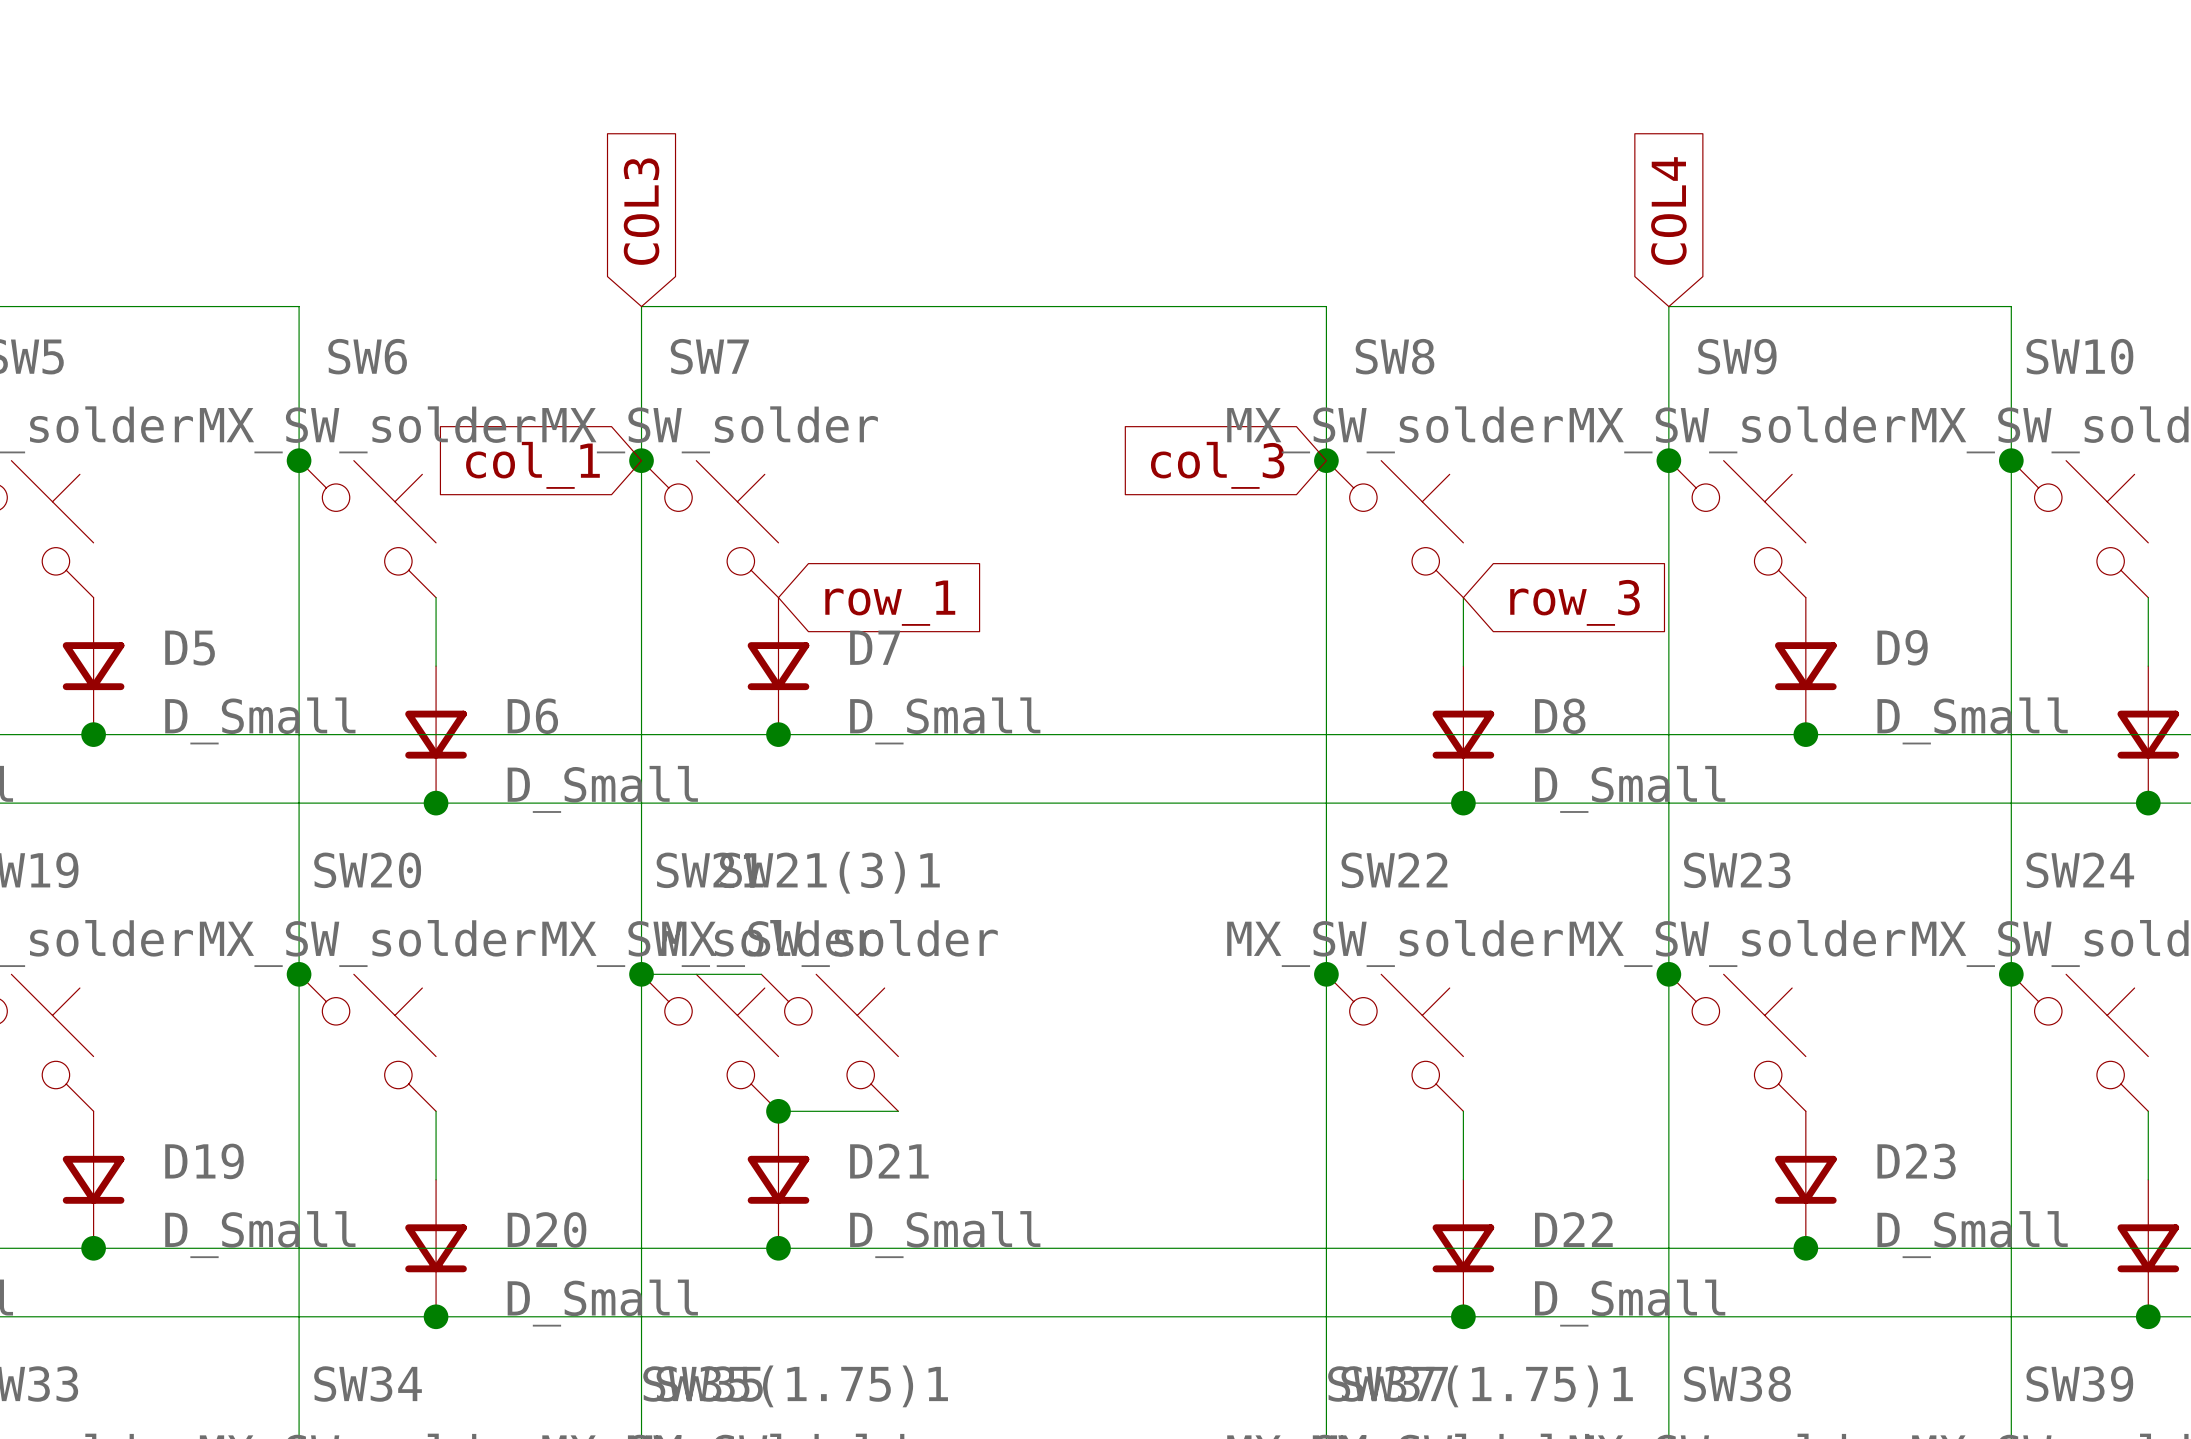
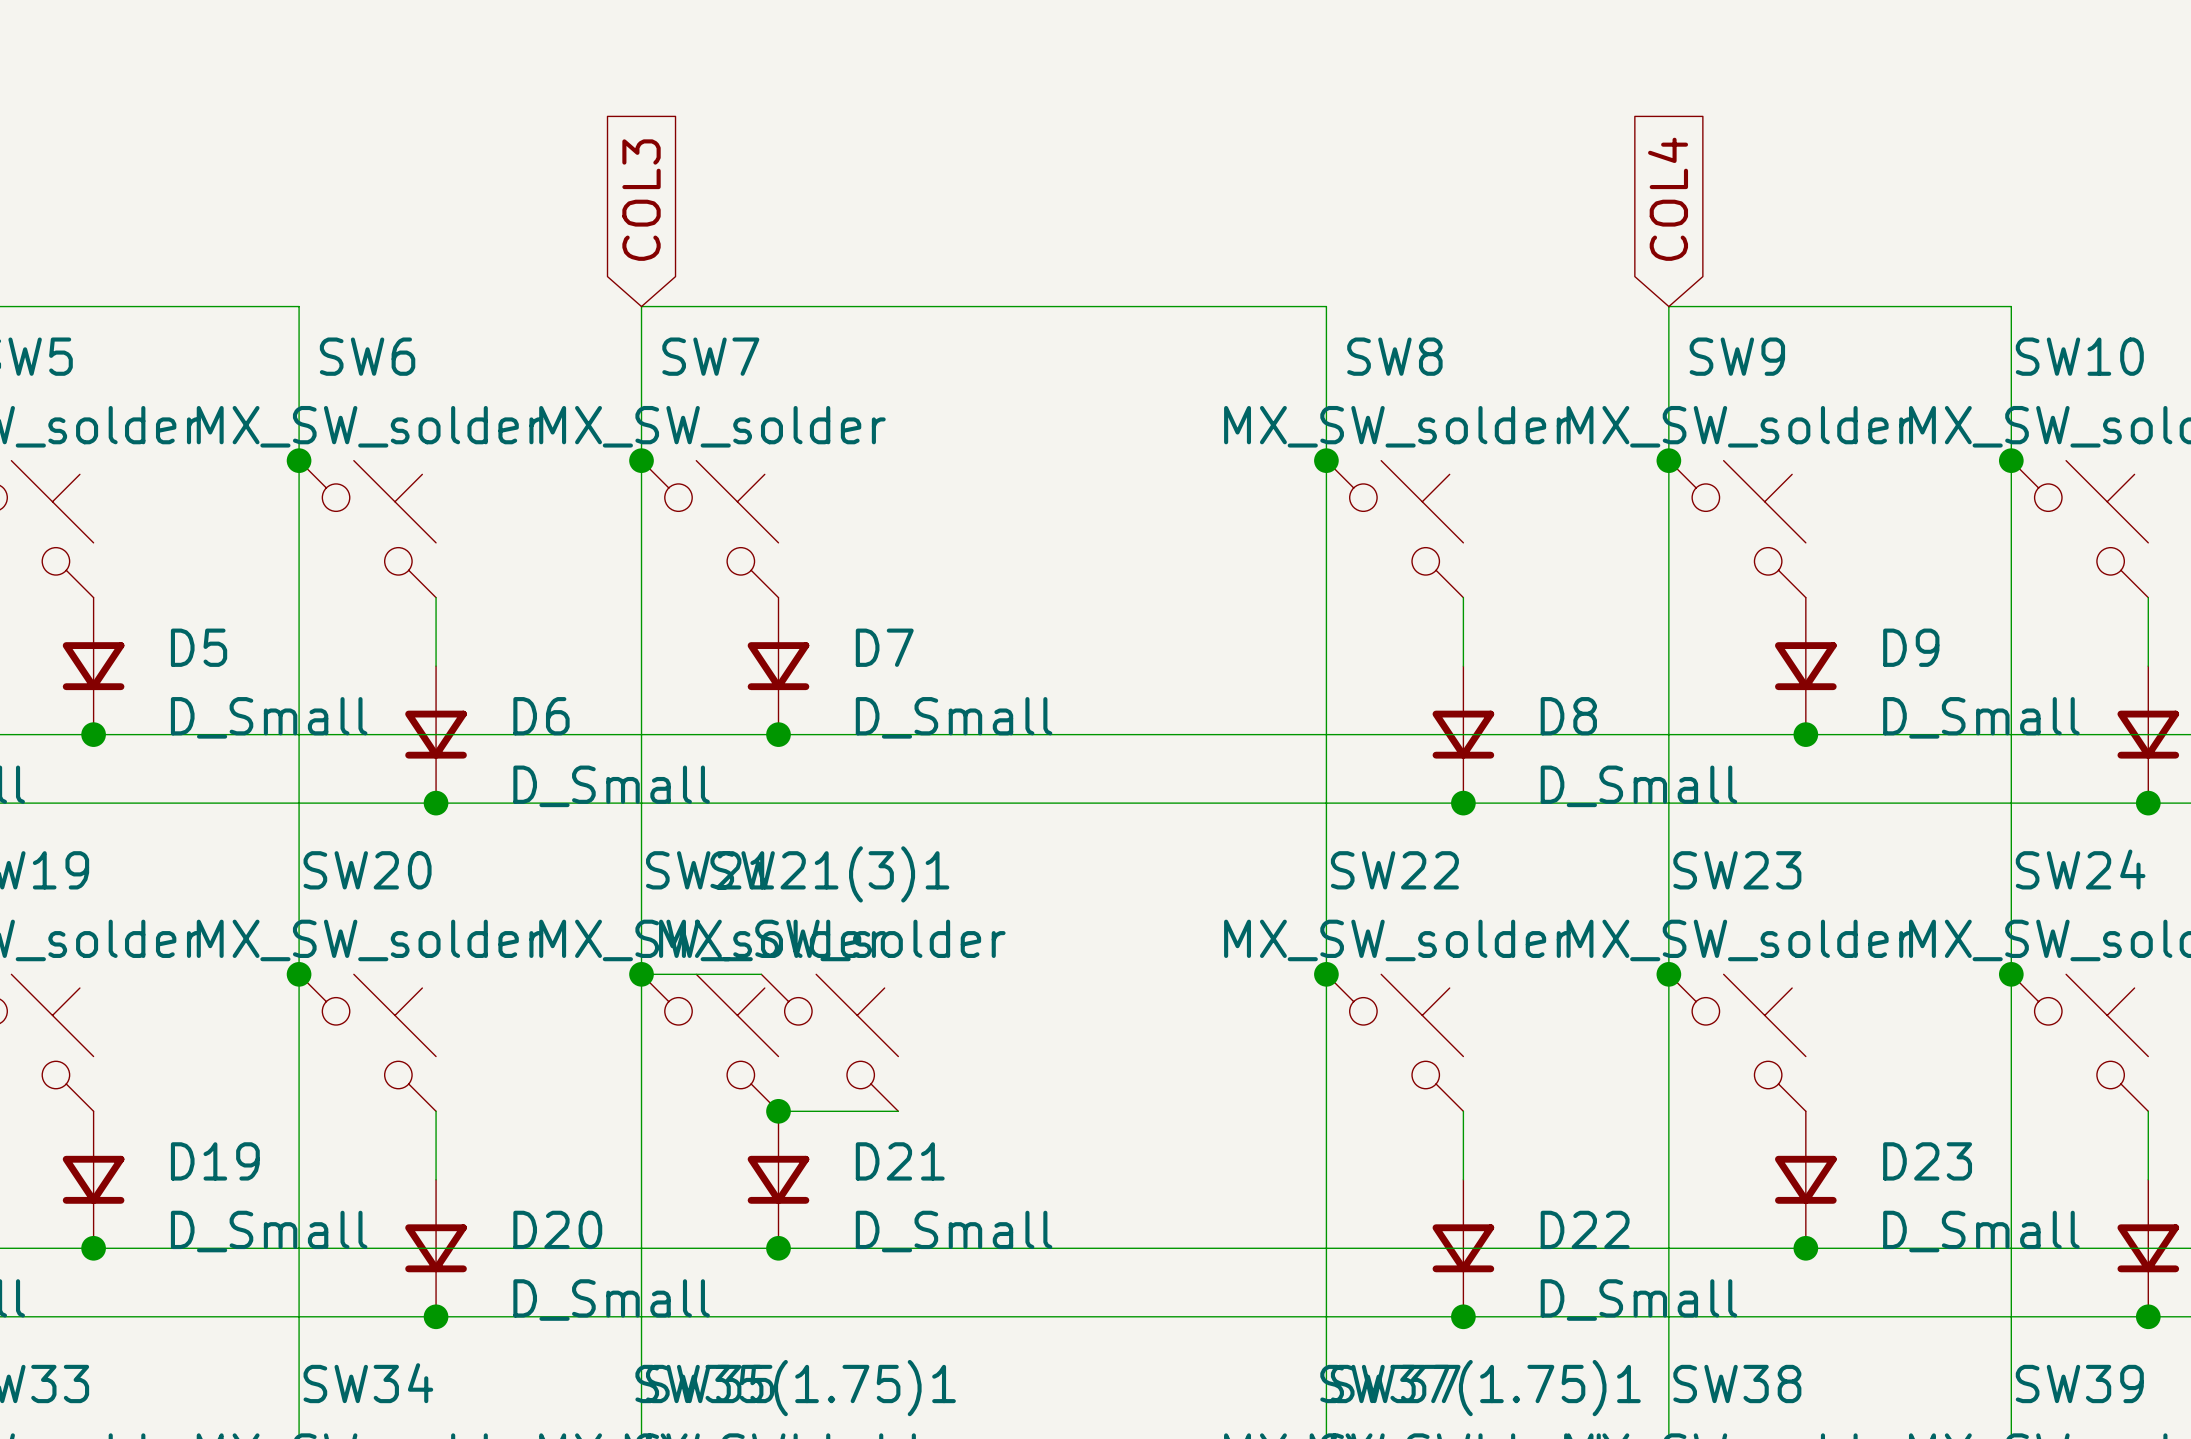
global label: col_1 (532, 465) -> none
global label: col_3 (1217, 465) -> none
global label: row_3 (1575, 602) -> none
global label: row_1 (890, 603) -> none

